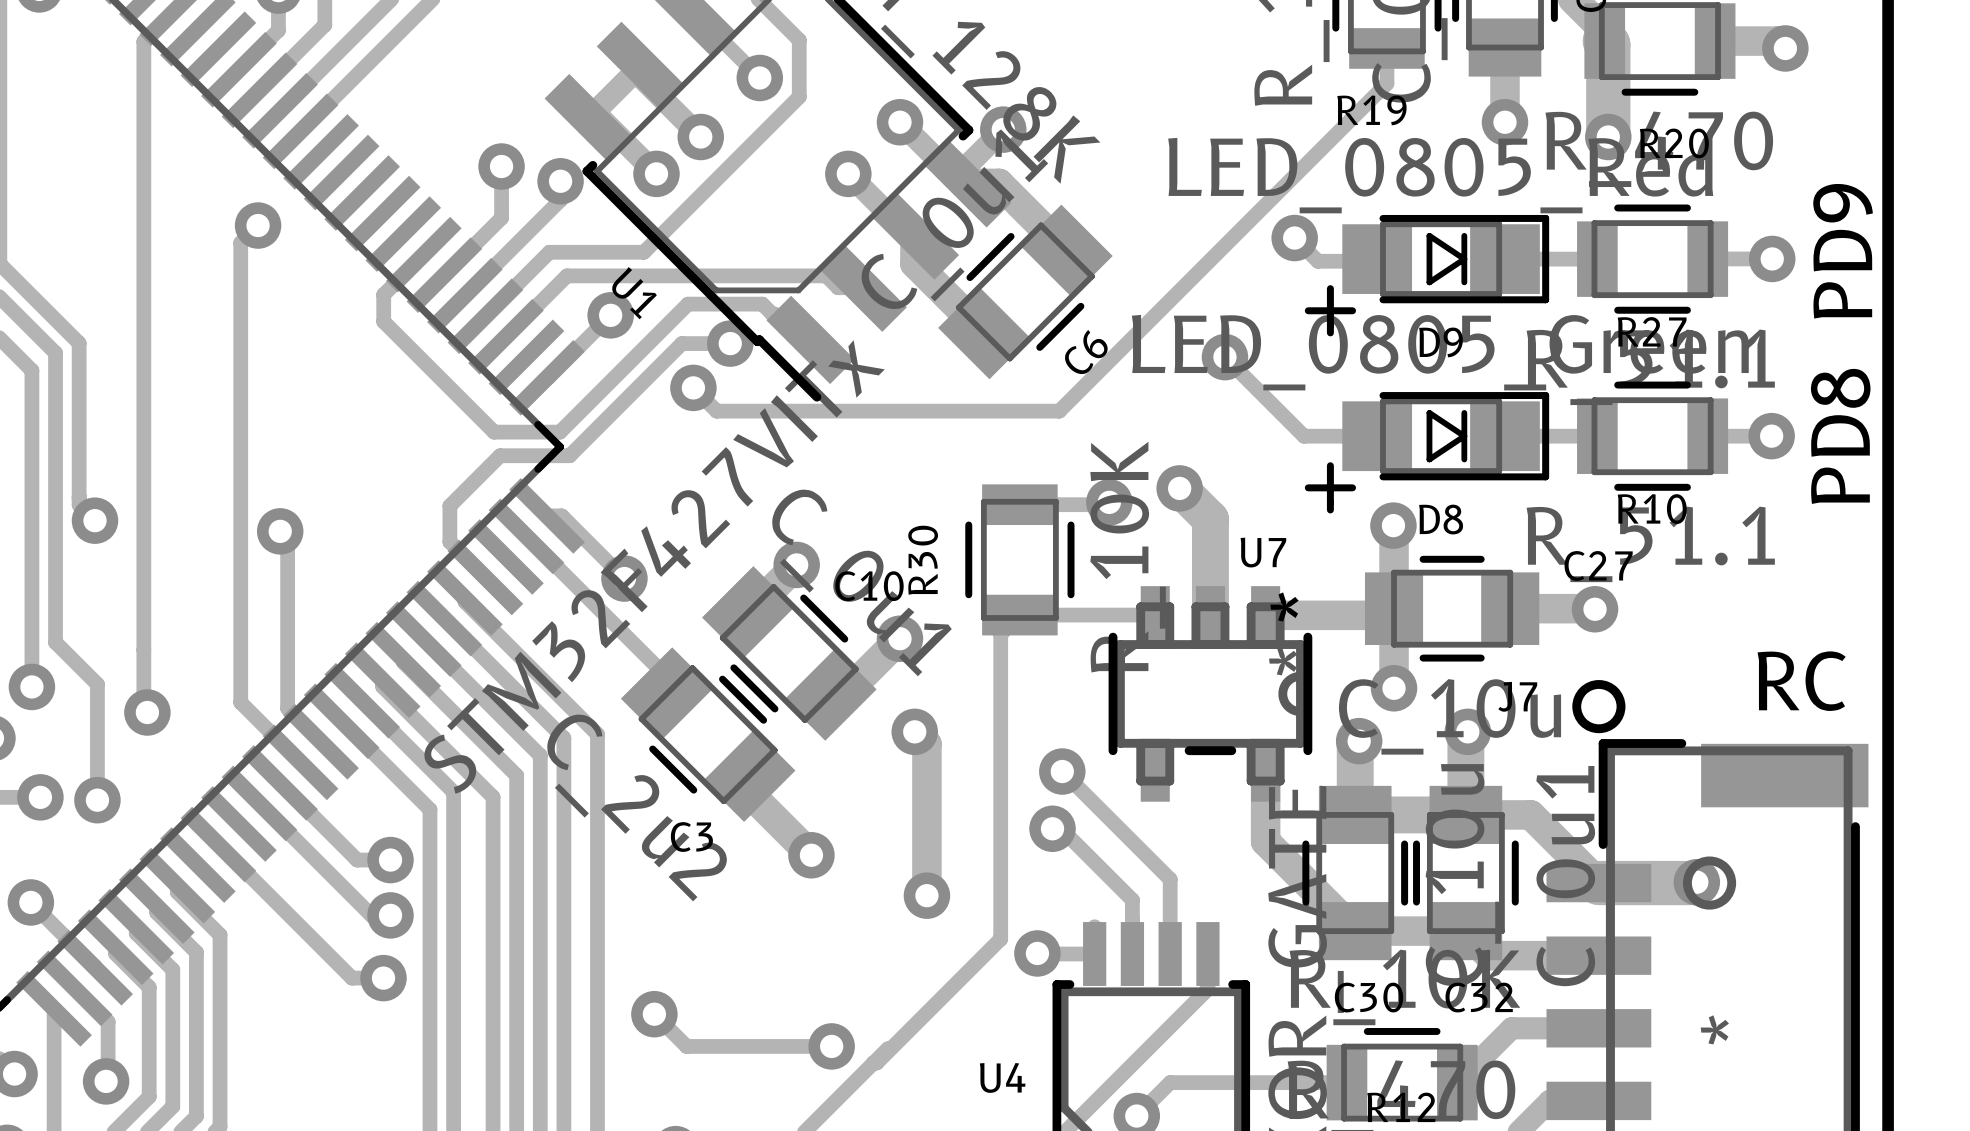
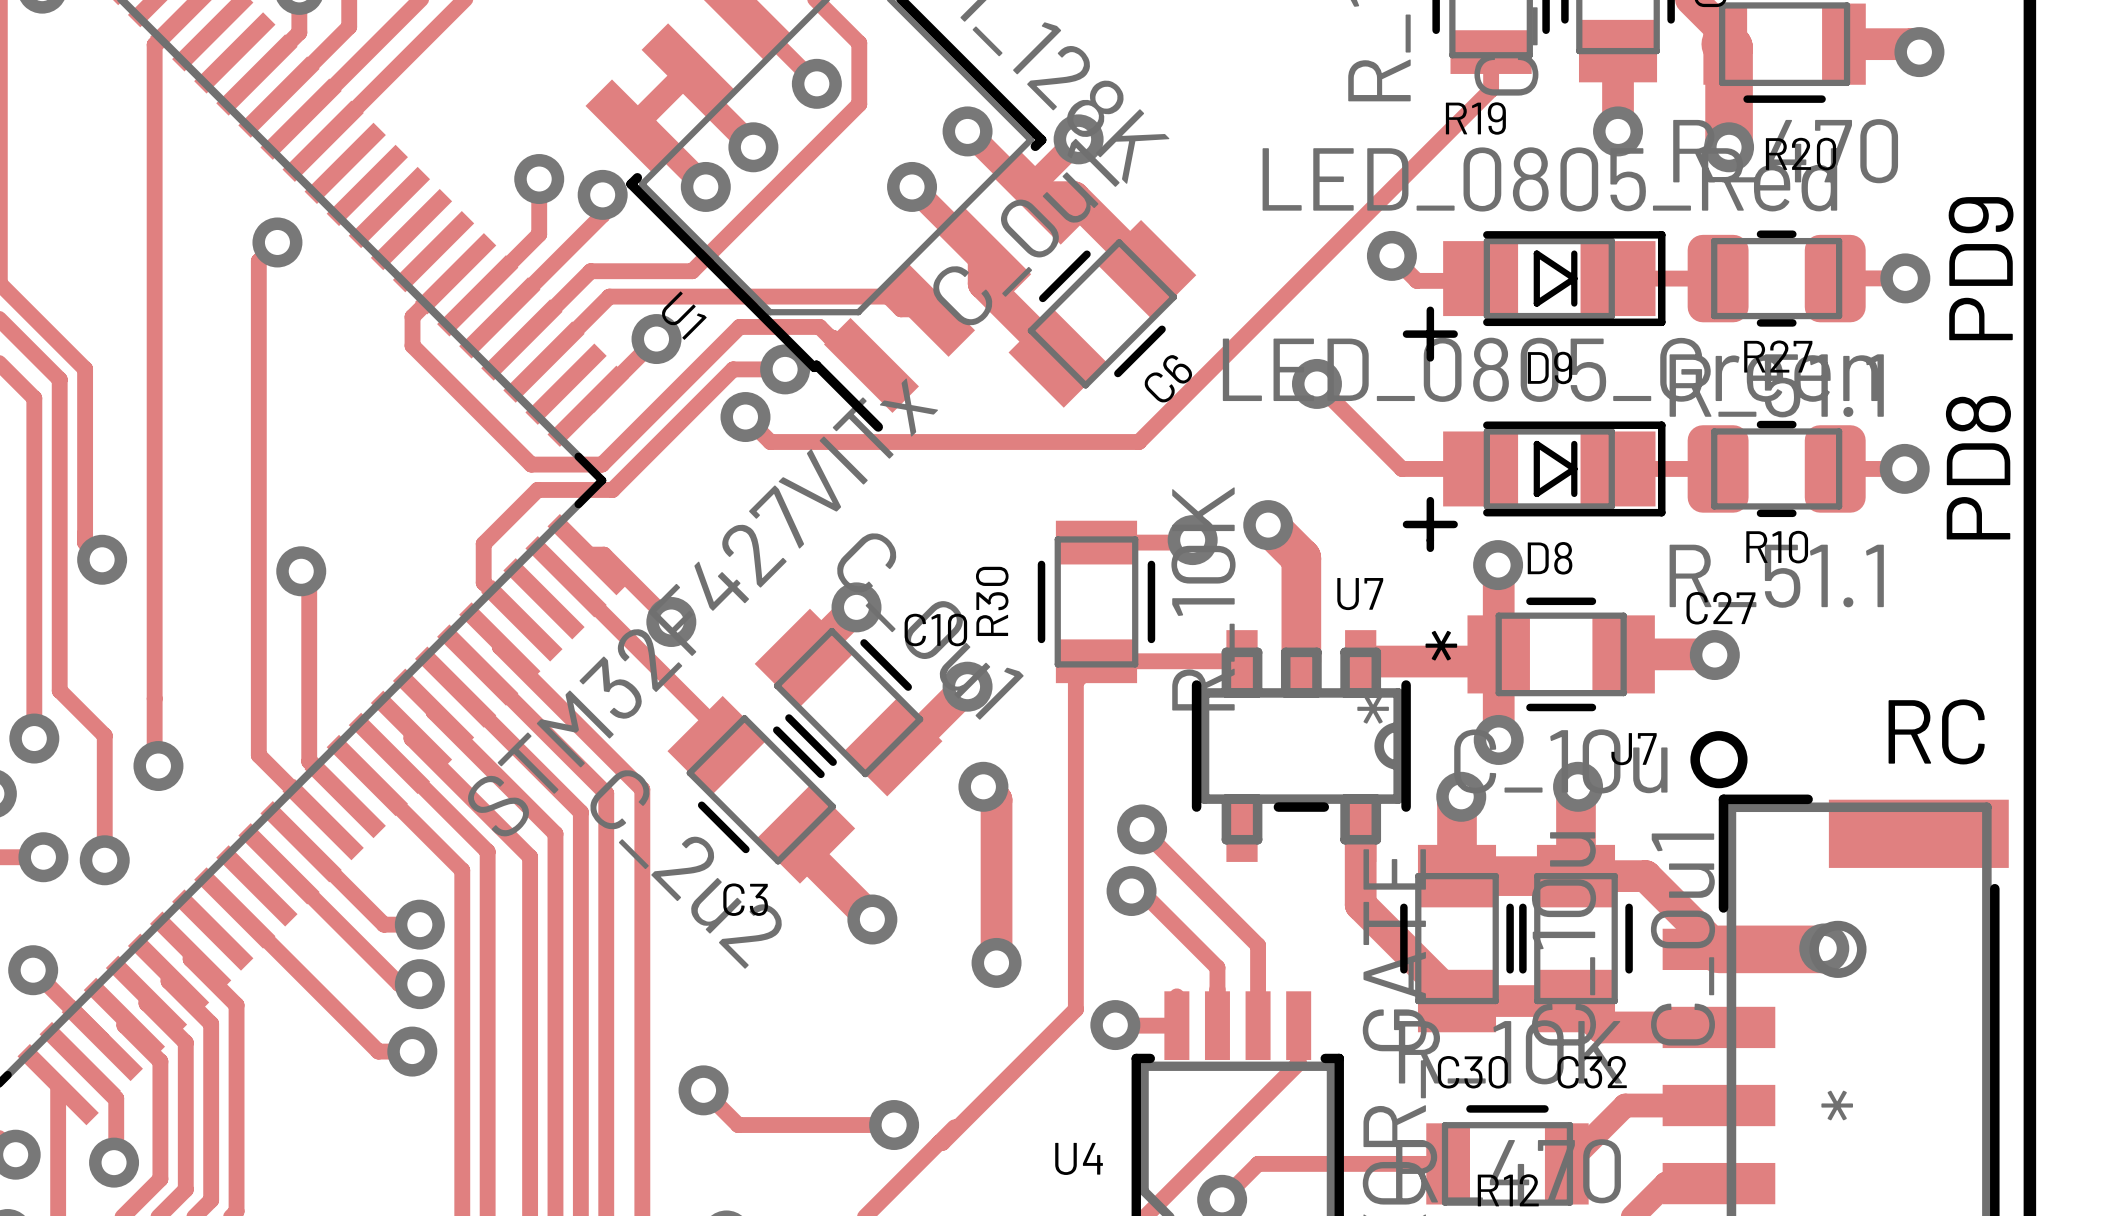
R27 footprint: [1577, 204, 1729, 314] -> [1687, 230, 1866, 327]
R10 footprint: [1577, 381, 1729, 491] -> [1687, 420, 1866, 518]
U7 text position: * (1284, 606) -> * (1441, 645)

